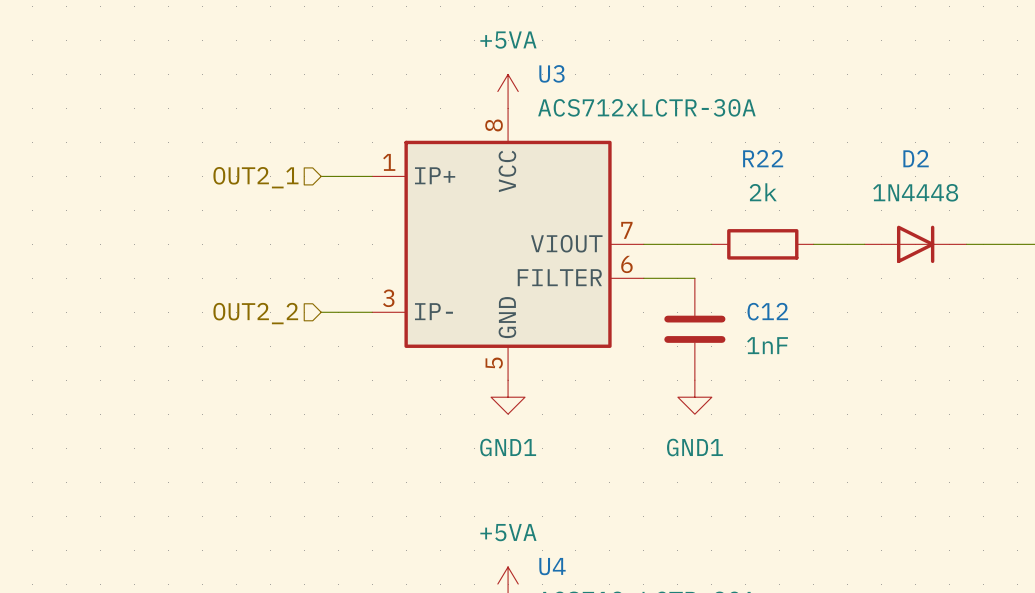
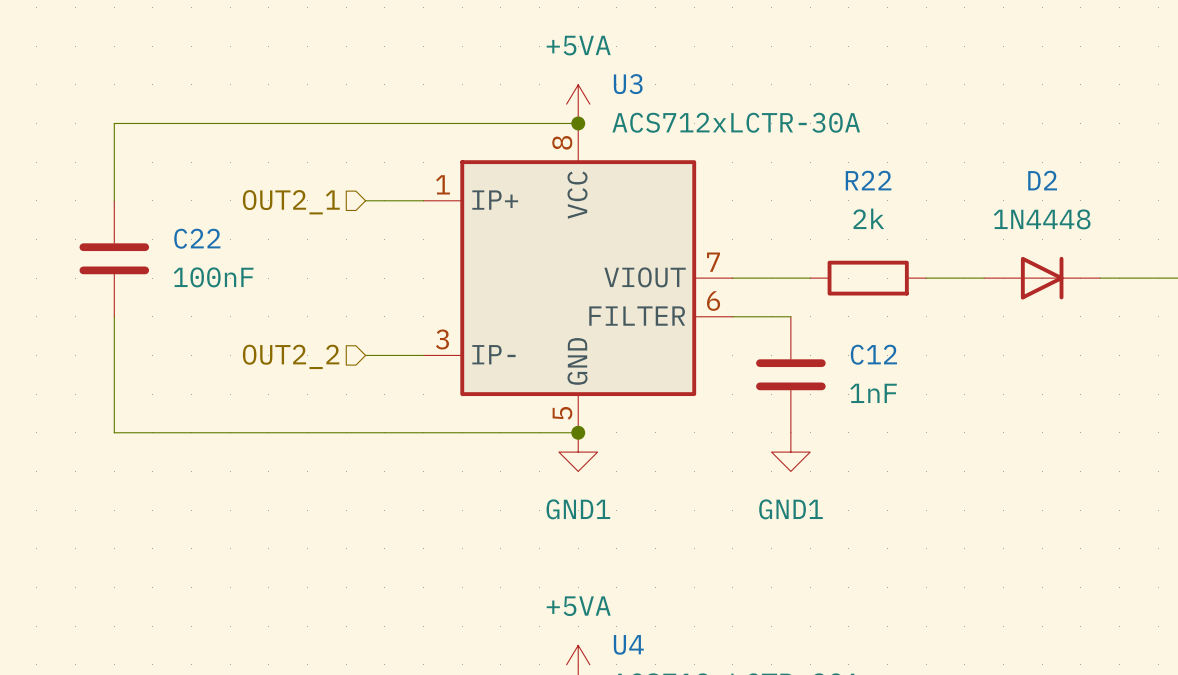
wire: none -> (578, 123) (114, 123) (114, 200)
junction: none -> (578, 123)
C22: none -> 100nF (114, 258)
wire: none -> (114, 316) (114, 432) (578, 432)
junction: none -> (578, 432)

